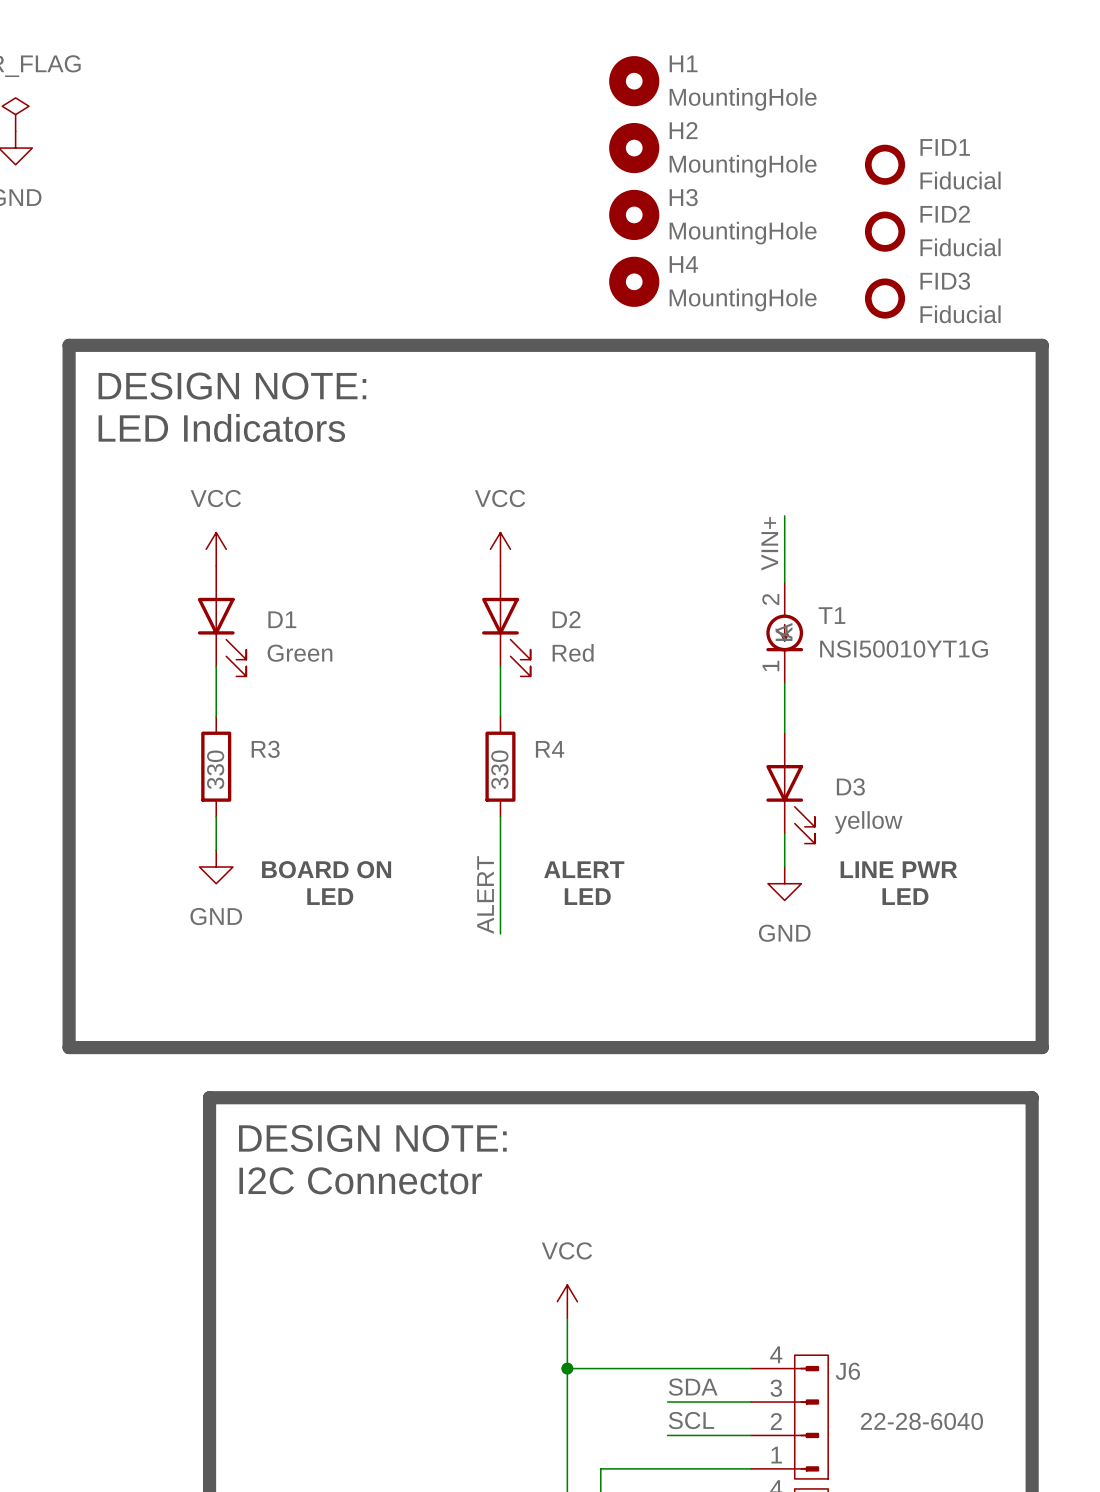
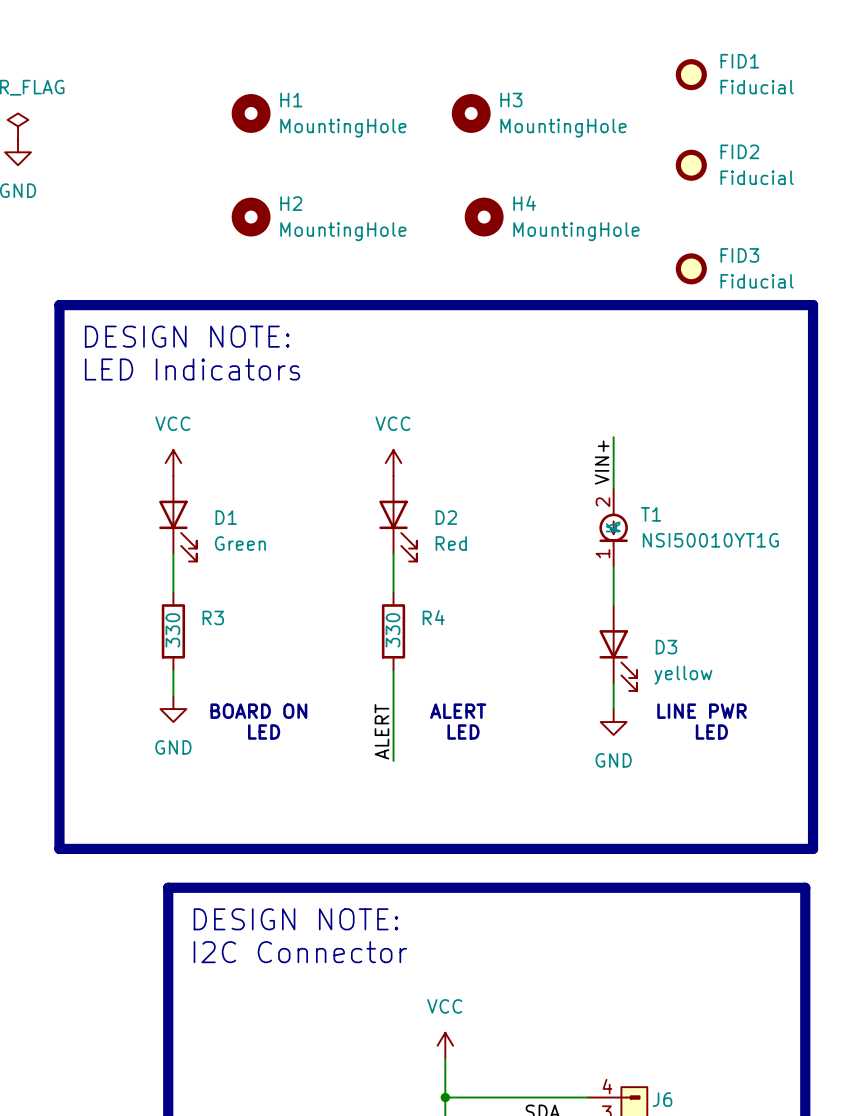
FID1: none -> Fiducial (691, 74)
H1 position: (634, 81) -> (251, 113)
FID1 name: FID1 (945, 147) -> FID2 (739, 151)
H2 position: (634, 148) -> (251, 217)
H3 position: (634, 214) -> (471, 113)
FID2: Fiducial (885, 231) -> none
H4 position: (634, 281) -> (484, 217)

